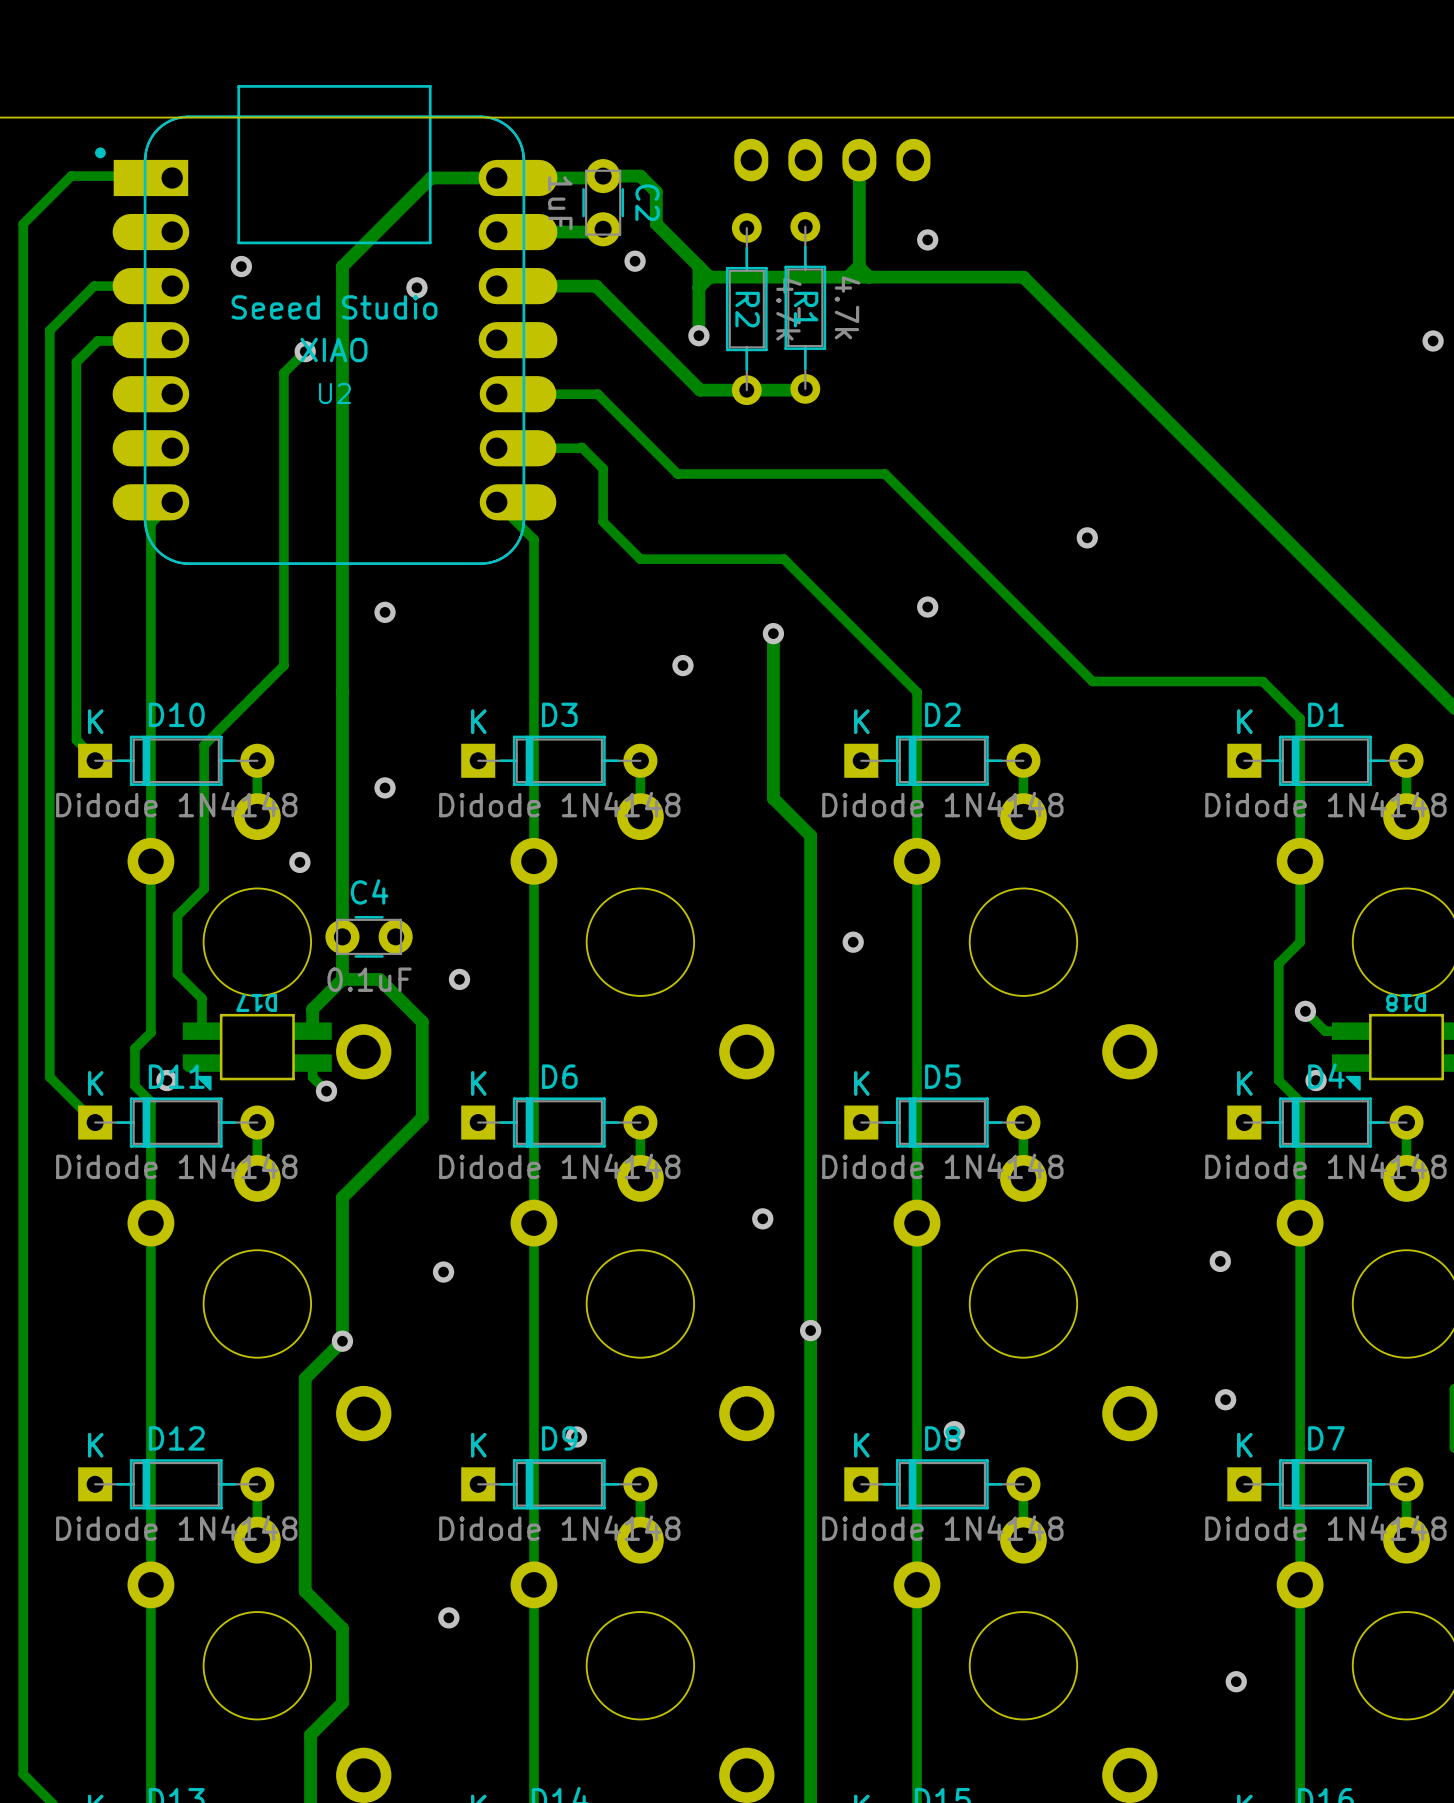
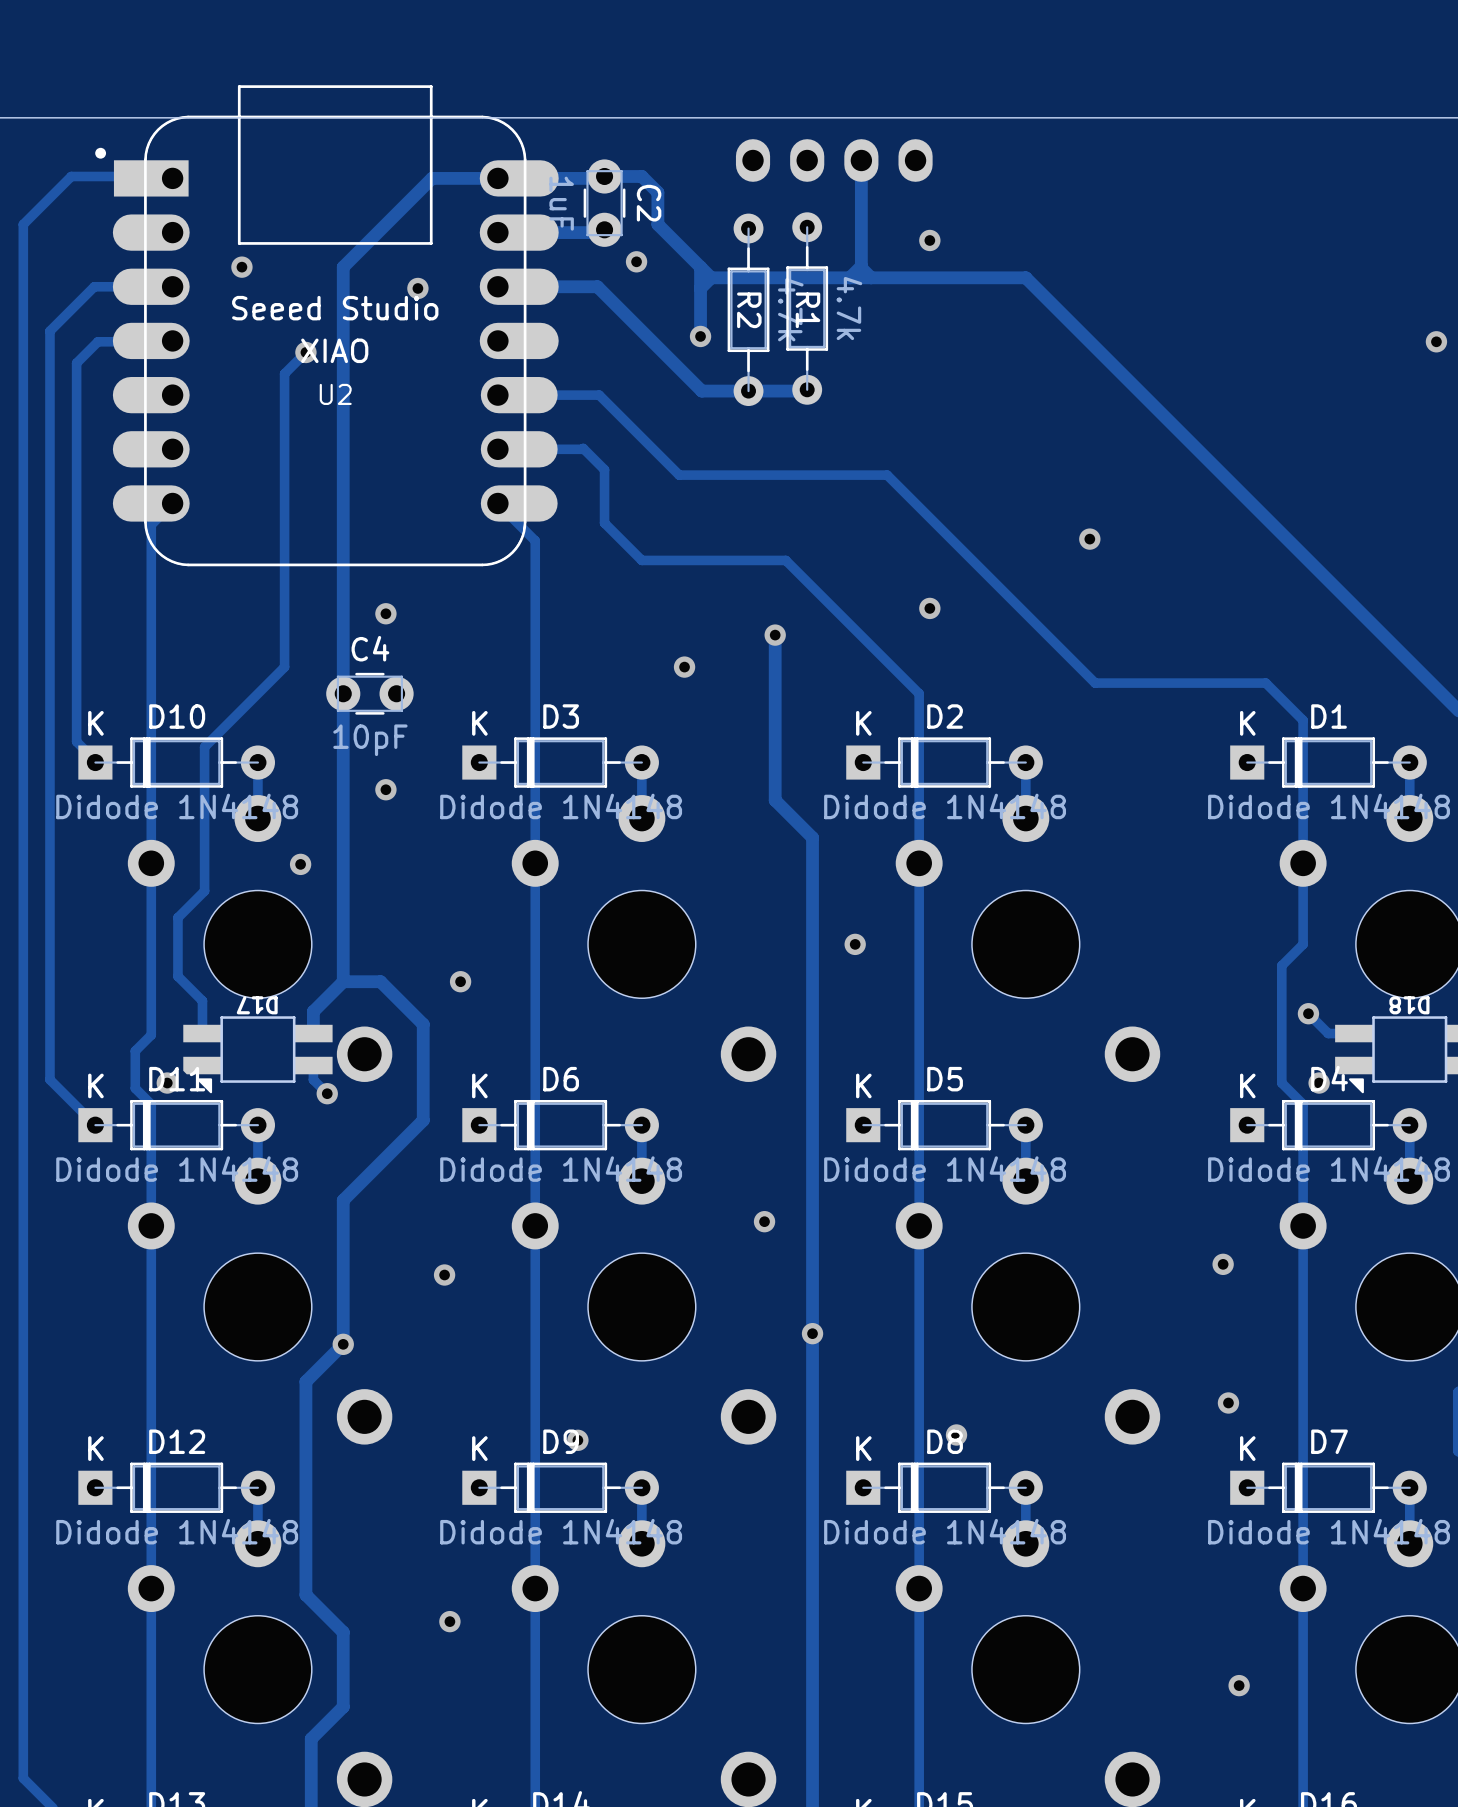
C4 position: (369, 936) -> (369, 693)
C4 value: 0.1uF (369, 979) -> 10pF (370, 740)

